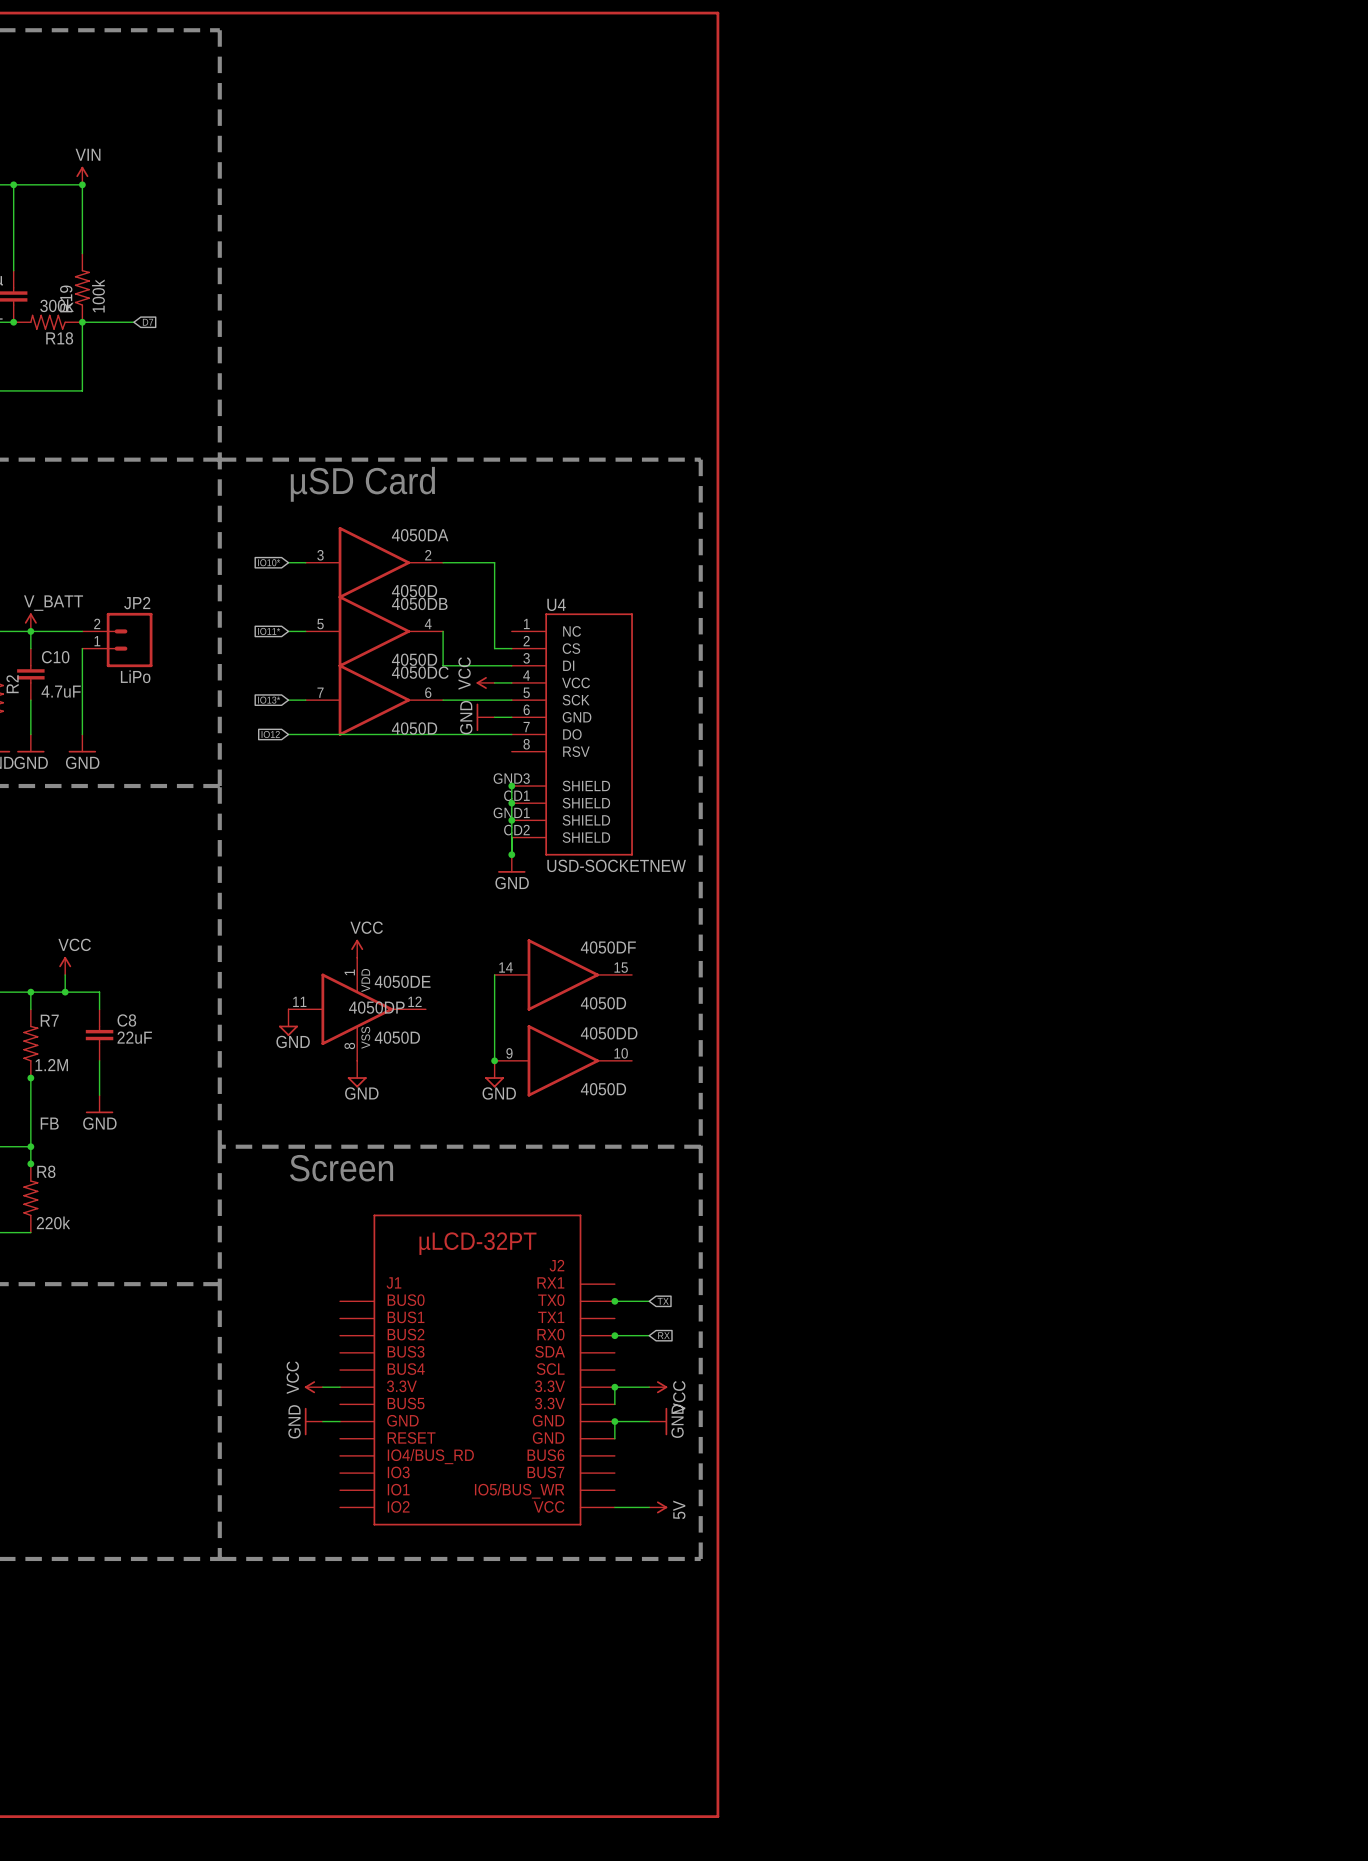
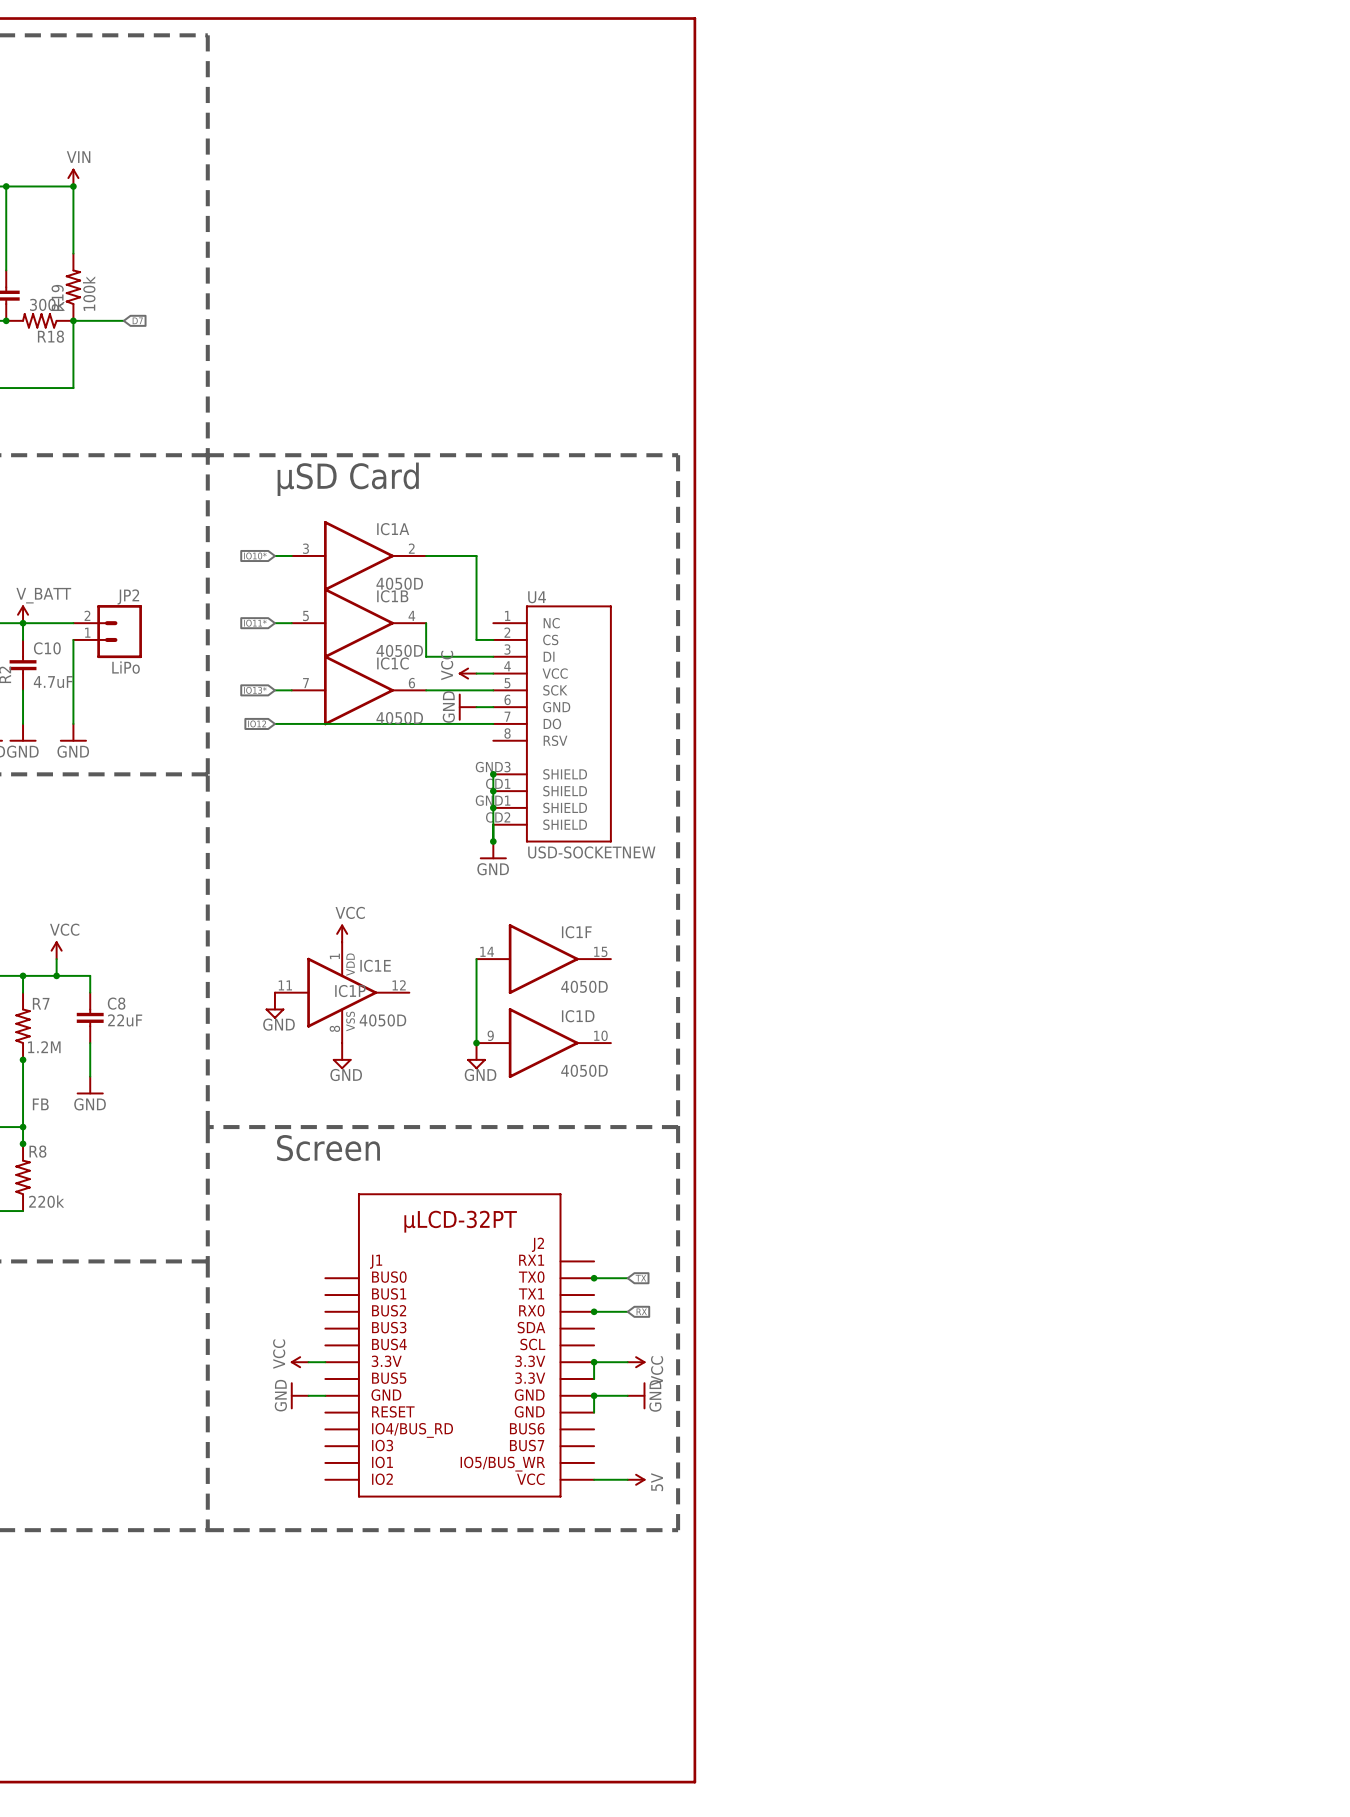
4050DA name: 4050DA (420, 535) -> IC1A (393, 529)
4050DB name: 4050DB (419, 603) -> IC1B (392, 596)
4050DC name: 4050DC (420, 672) -> IC1C (392, 663)
4050DF name: 4050DF (608, 947) -> IC1F (576, 932)
4050DE name: 4050DE (402, 981) -> IC1E (375, 965)
4050DP name: 4050DP (376, 1007) -> IC1P (350, 991)
4050DD name: 4050DD (609, 1033) -> IC1D (578, 1016)

